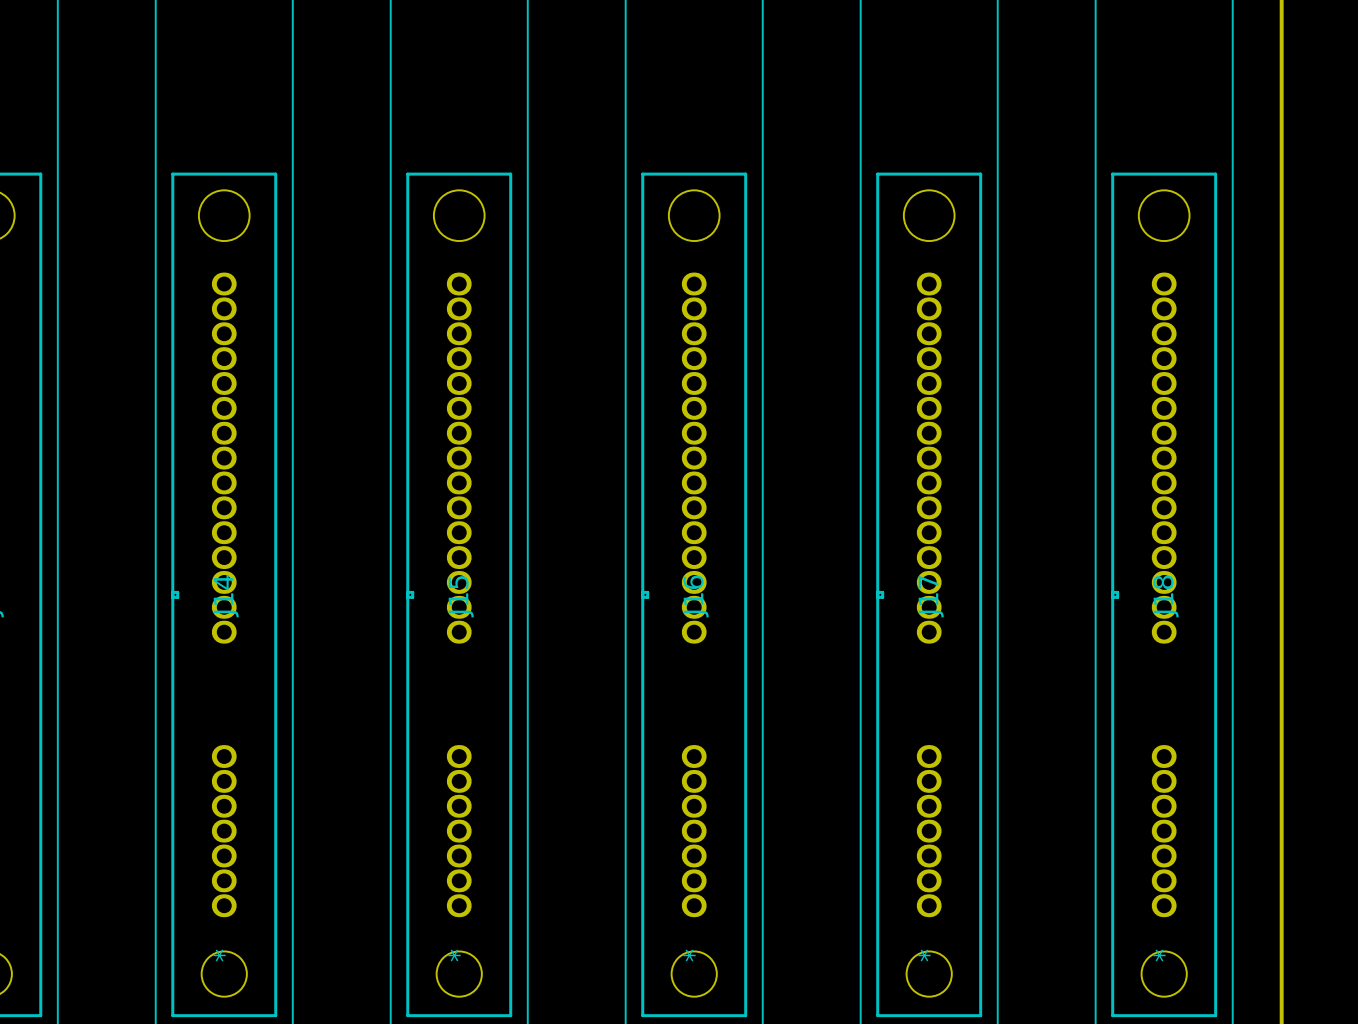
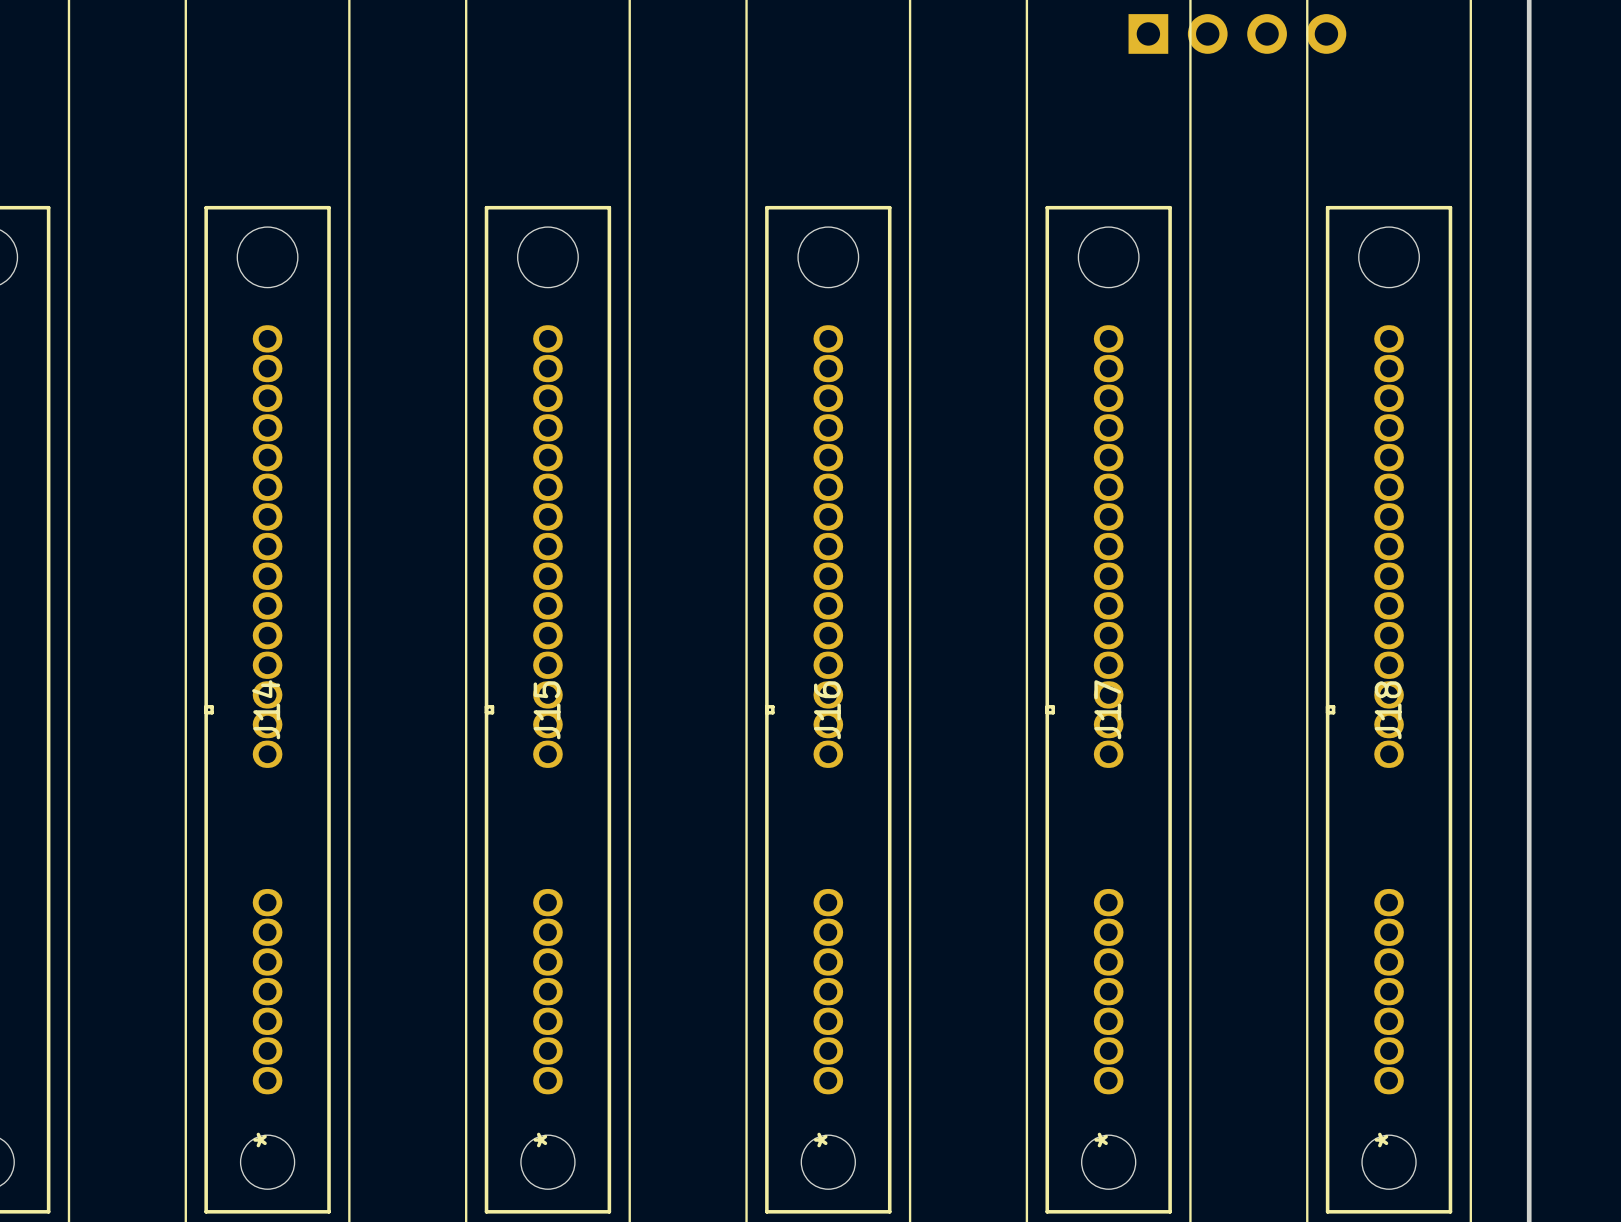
part: none -> (1237, 33)

